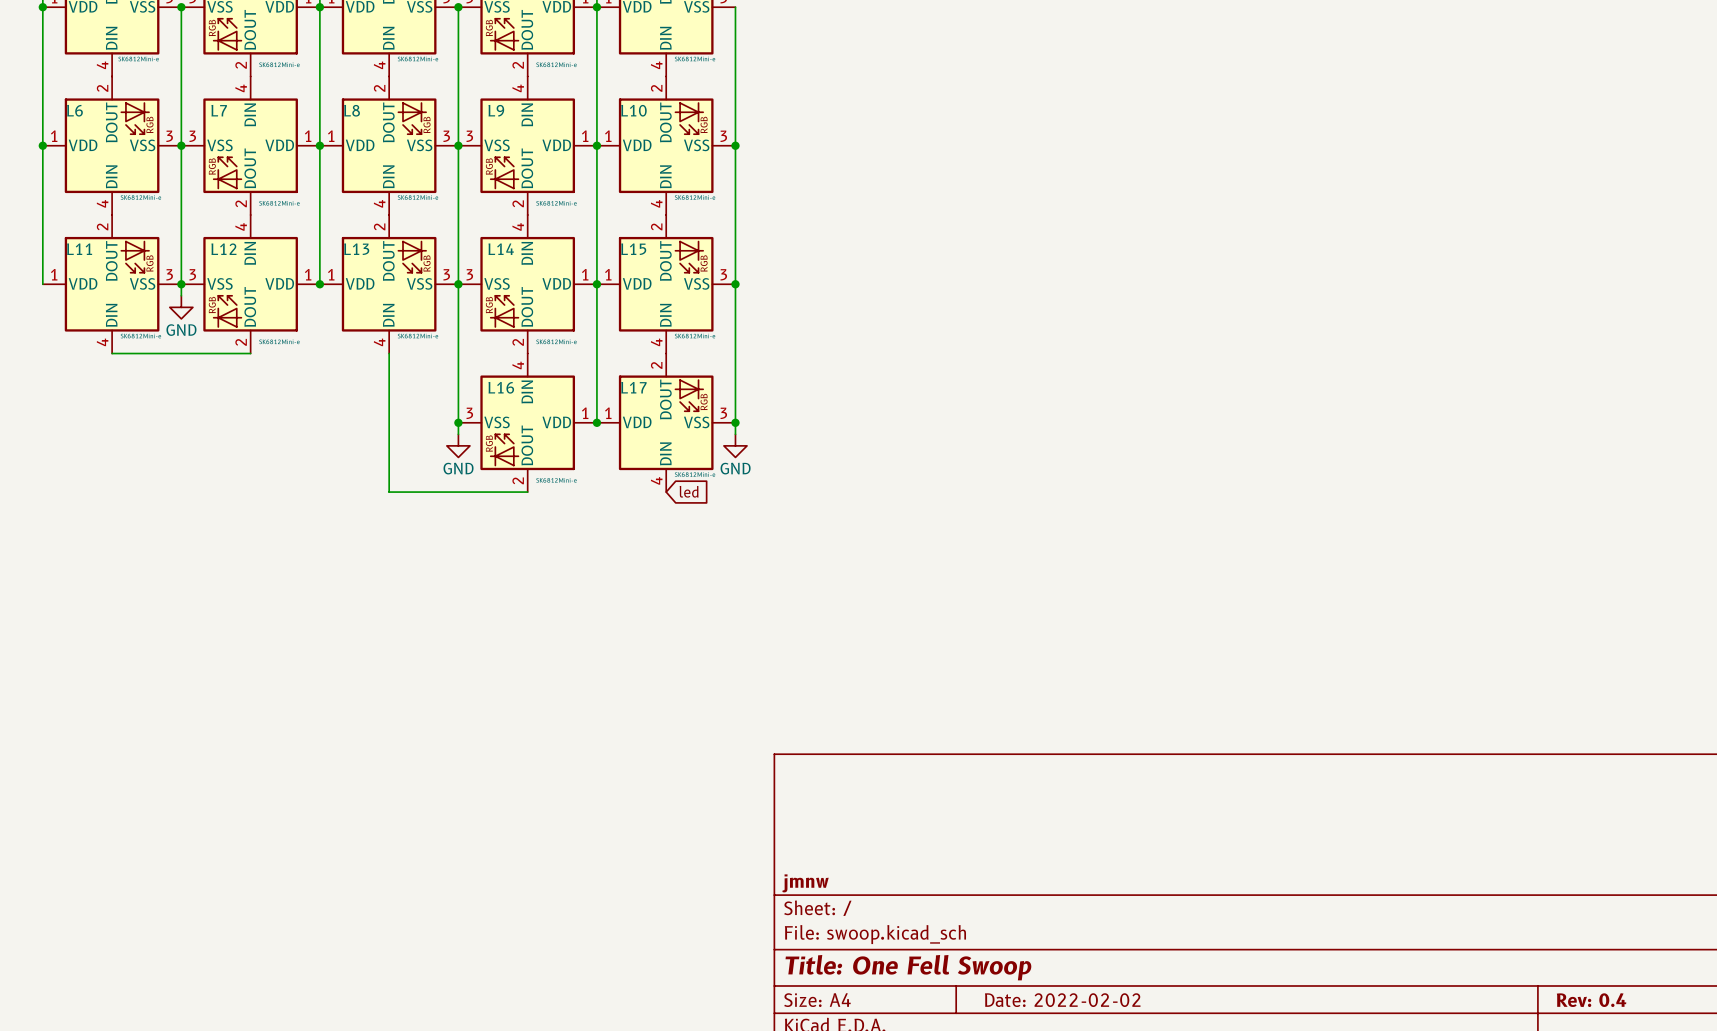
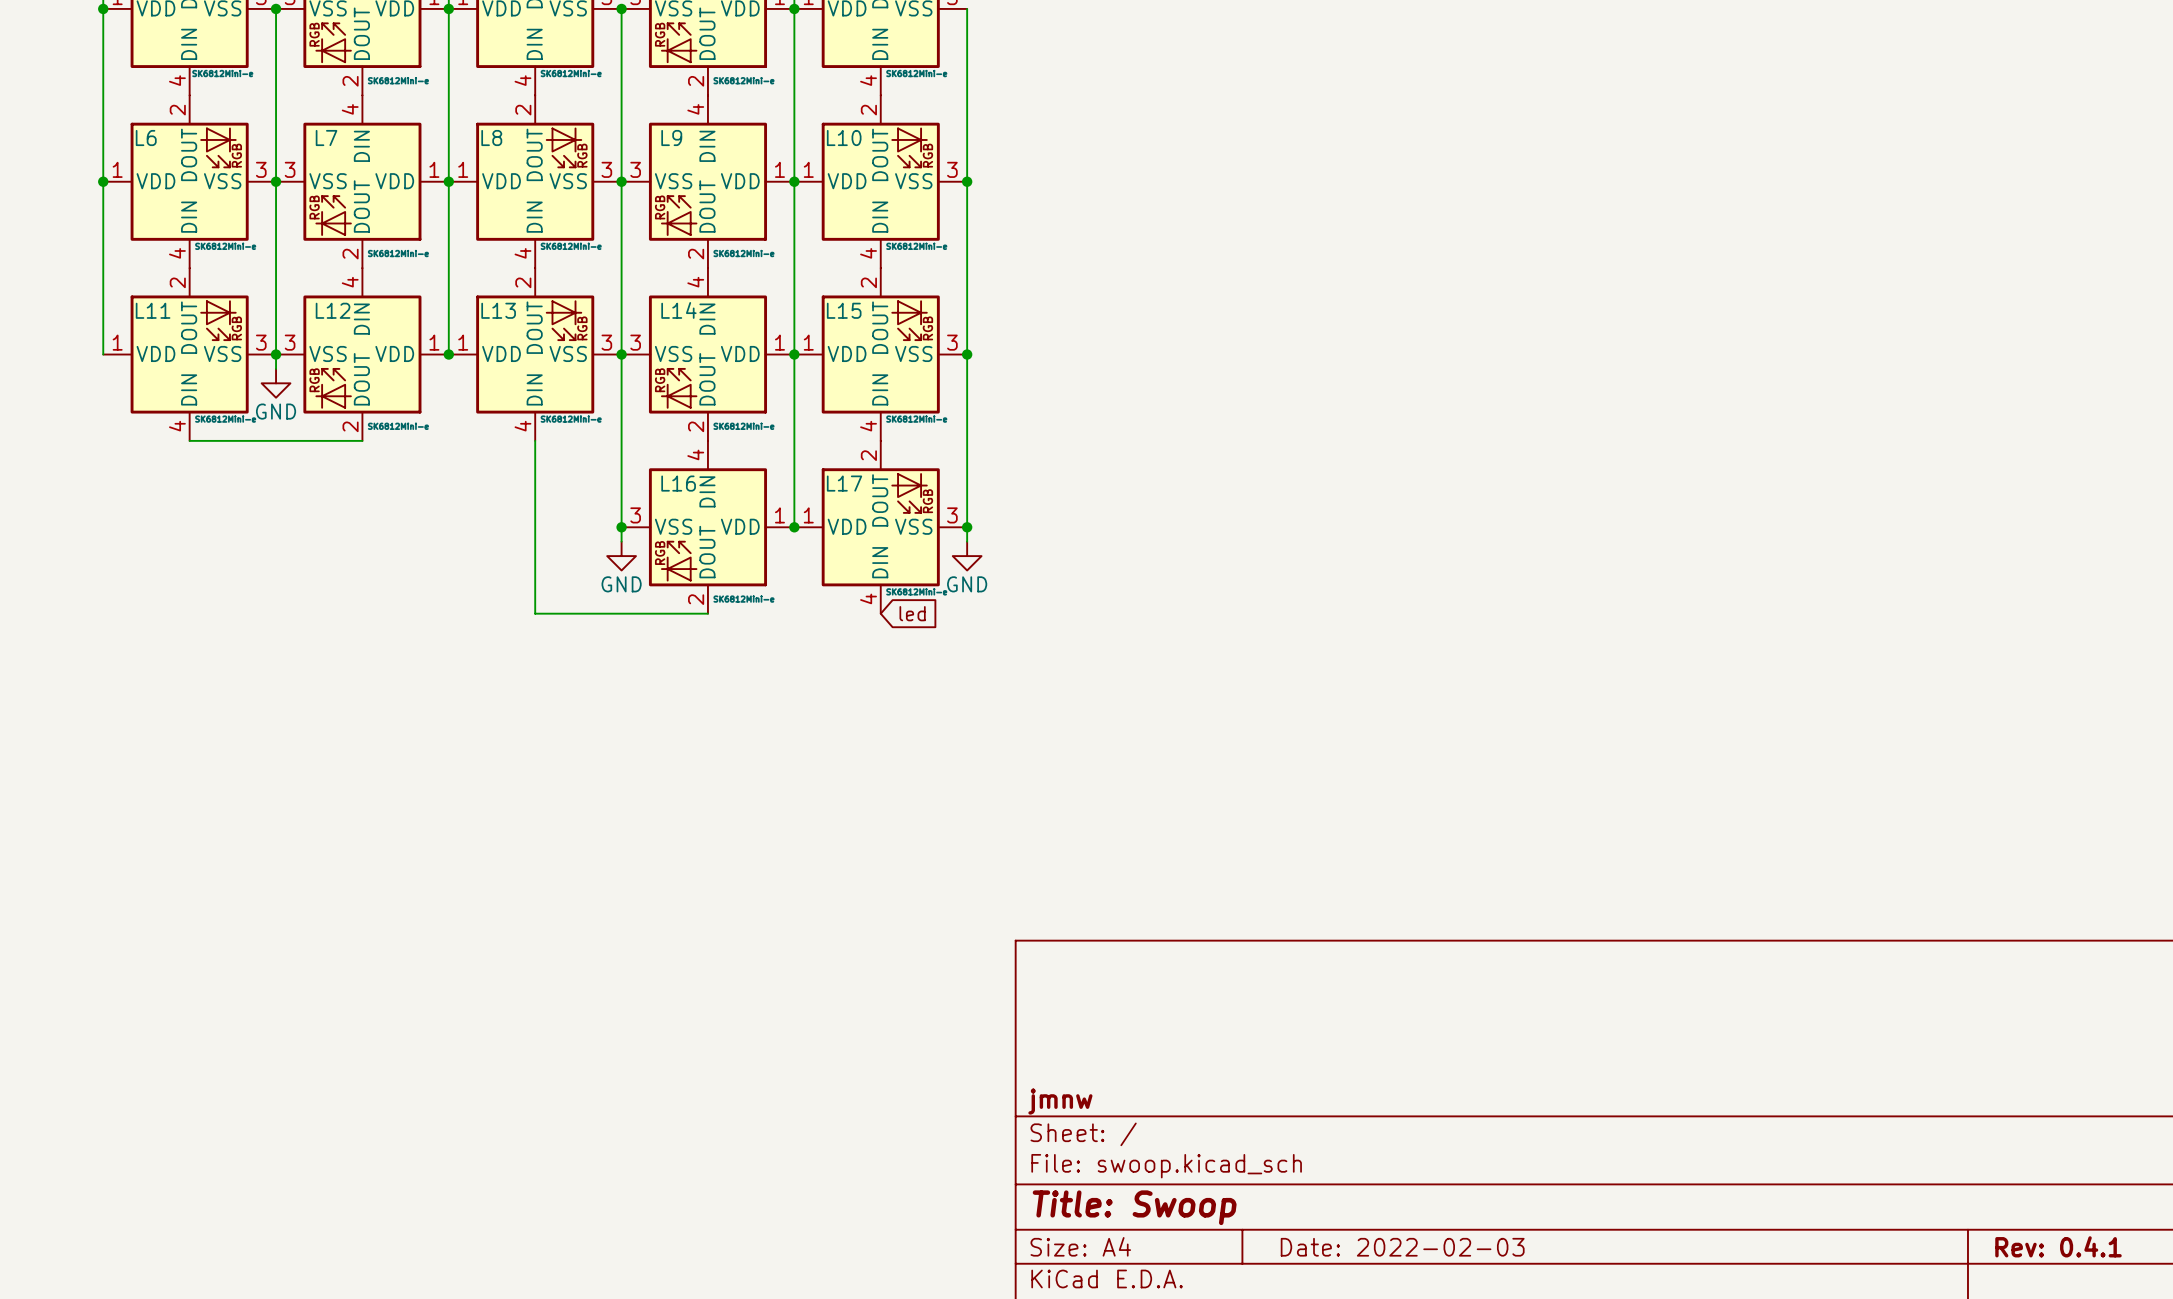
title block: Title: One Fell Swoop (908, 967) -> Title: Swoop (1134, 1207)
title block: Date: 2022-02-02 (1062, 1000) -> Date: 2022-02-03 (1402, 1247)
title block: Rev: 0.4 (1591, 1000) -> Rev: 0.4.1 (2058, 1246)

